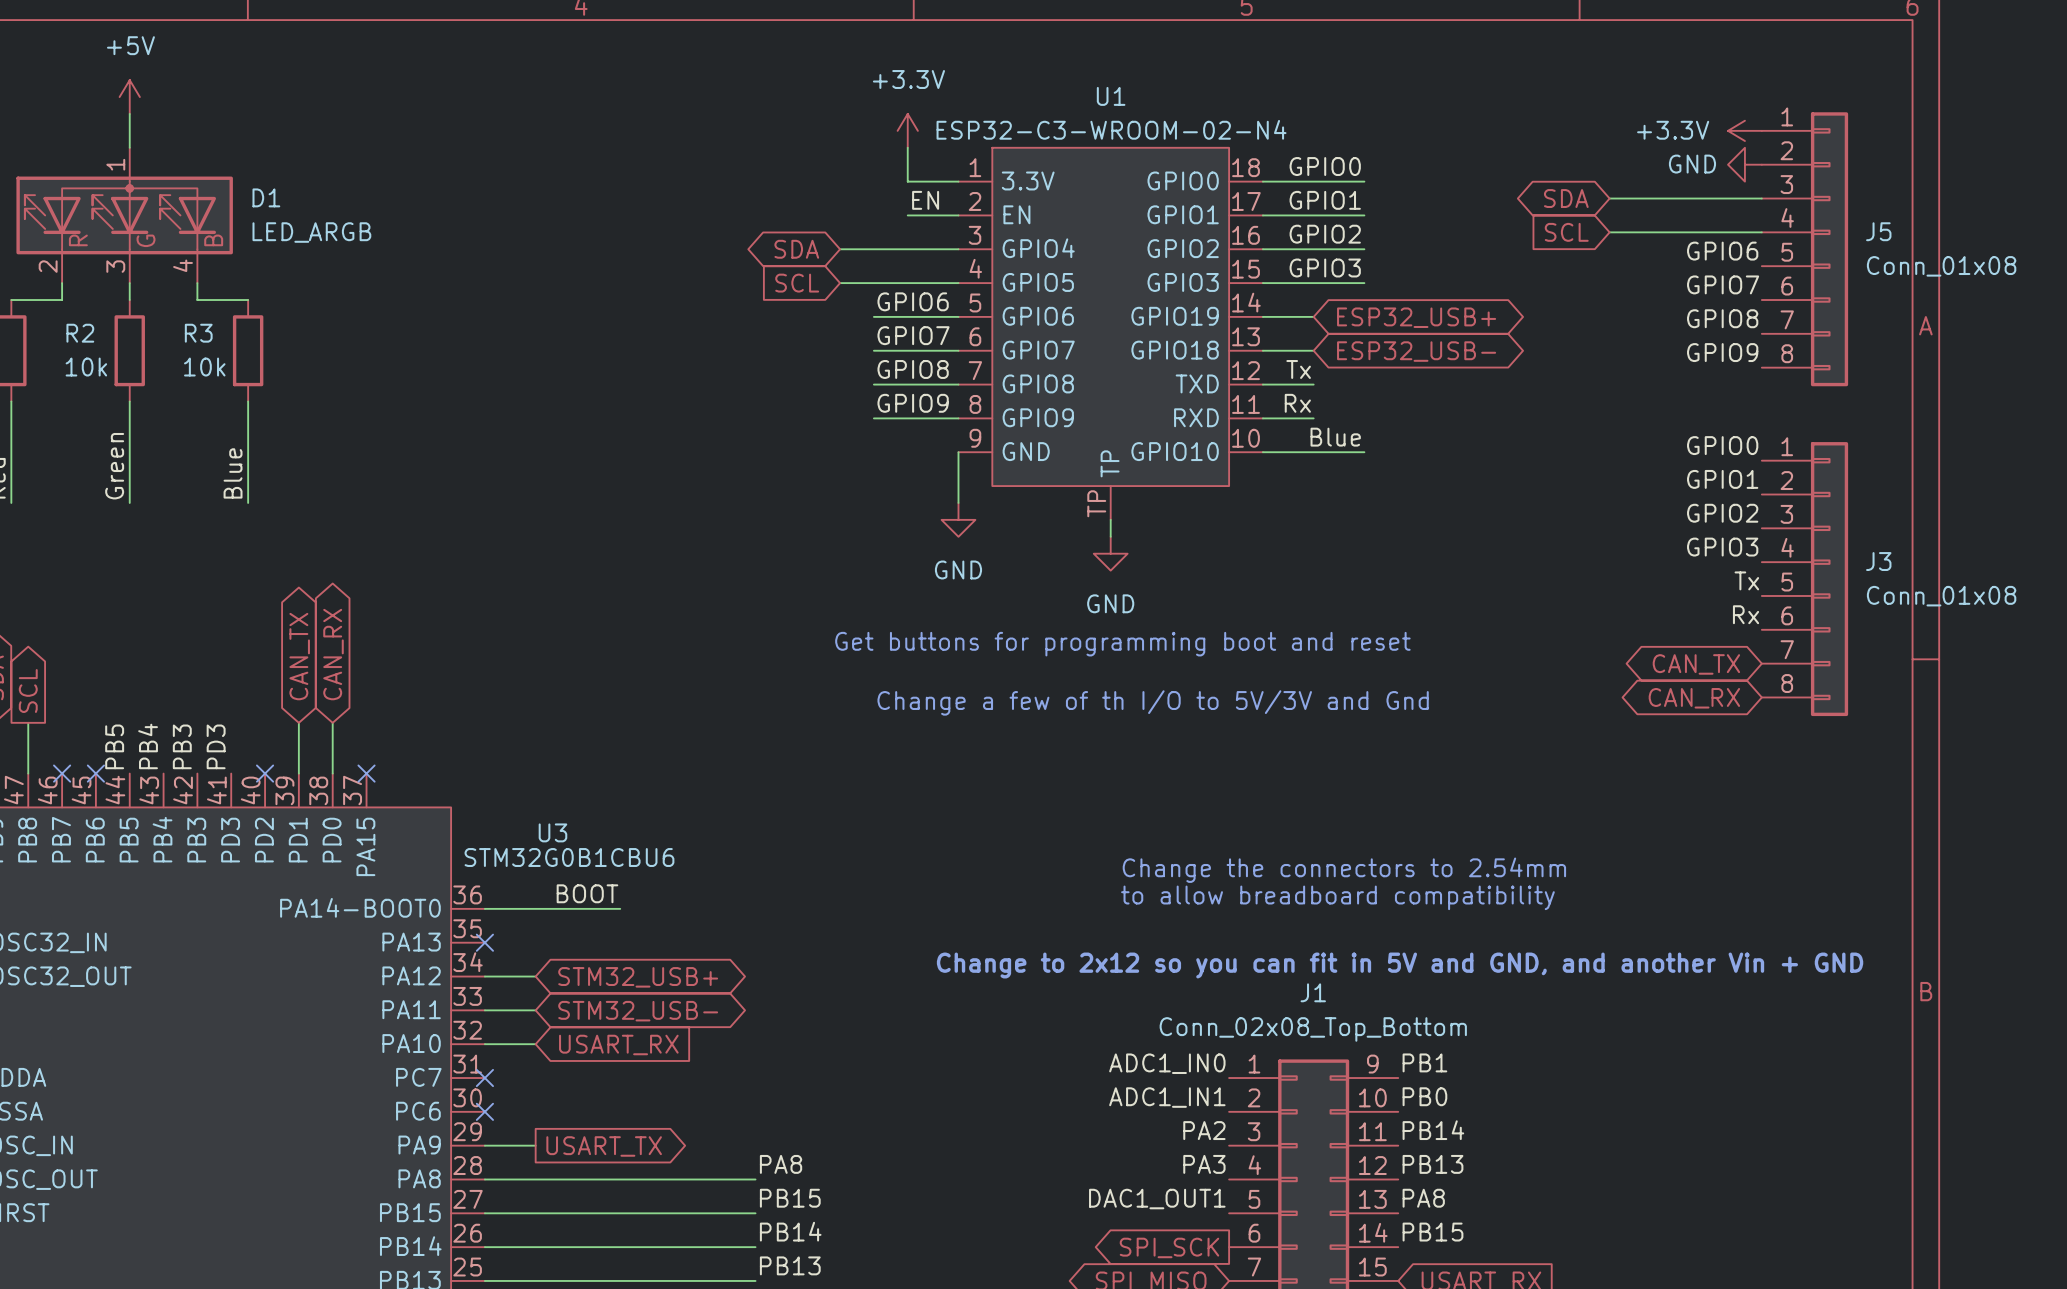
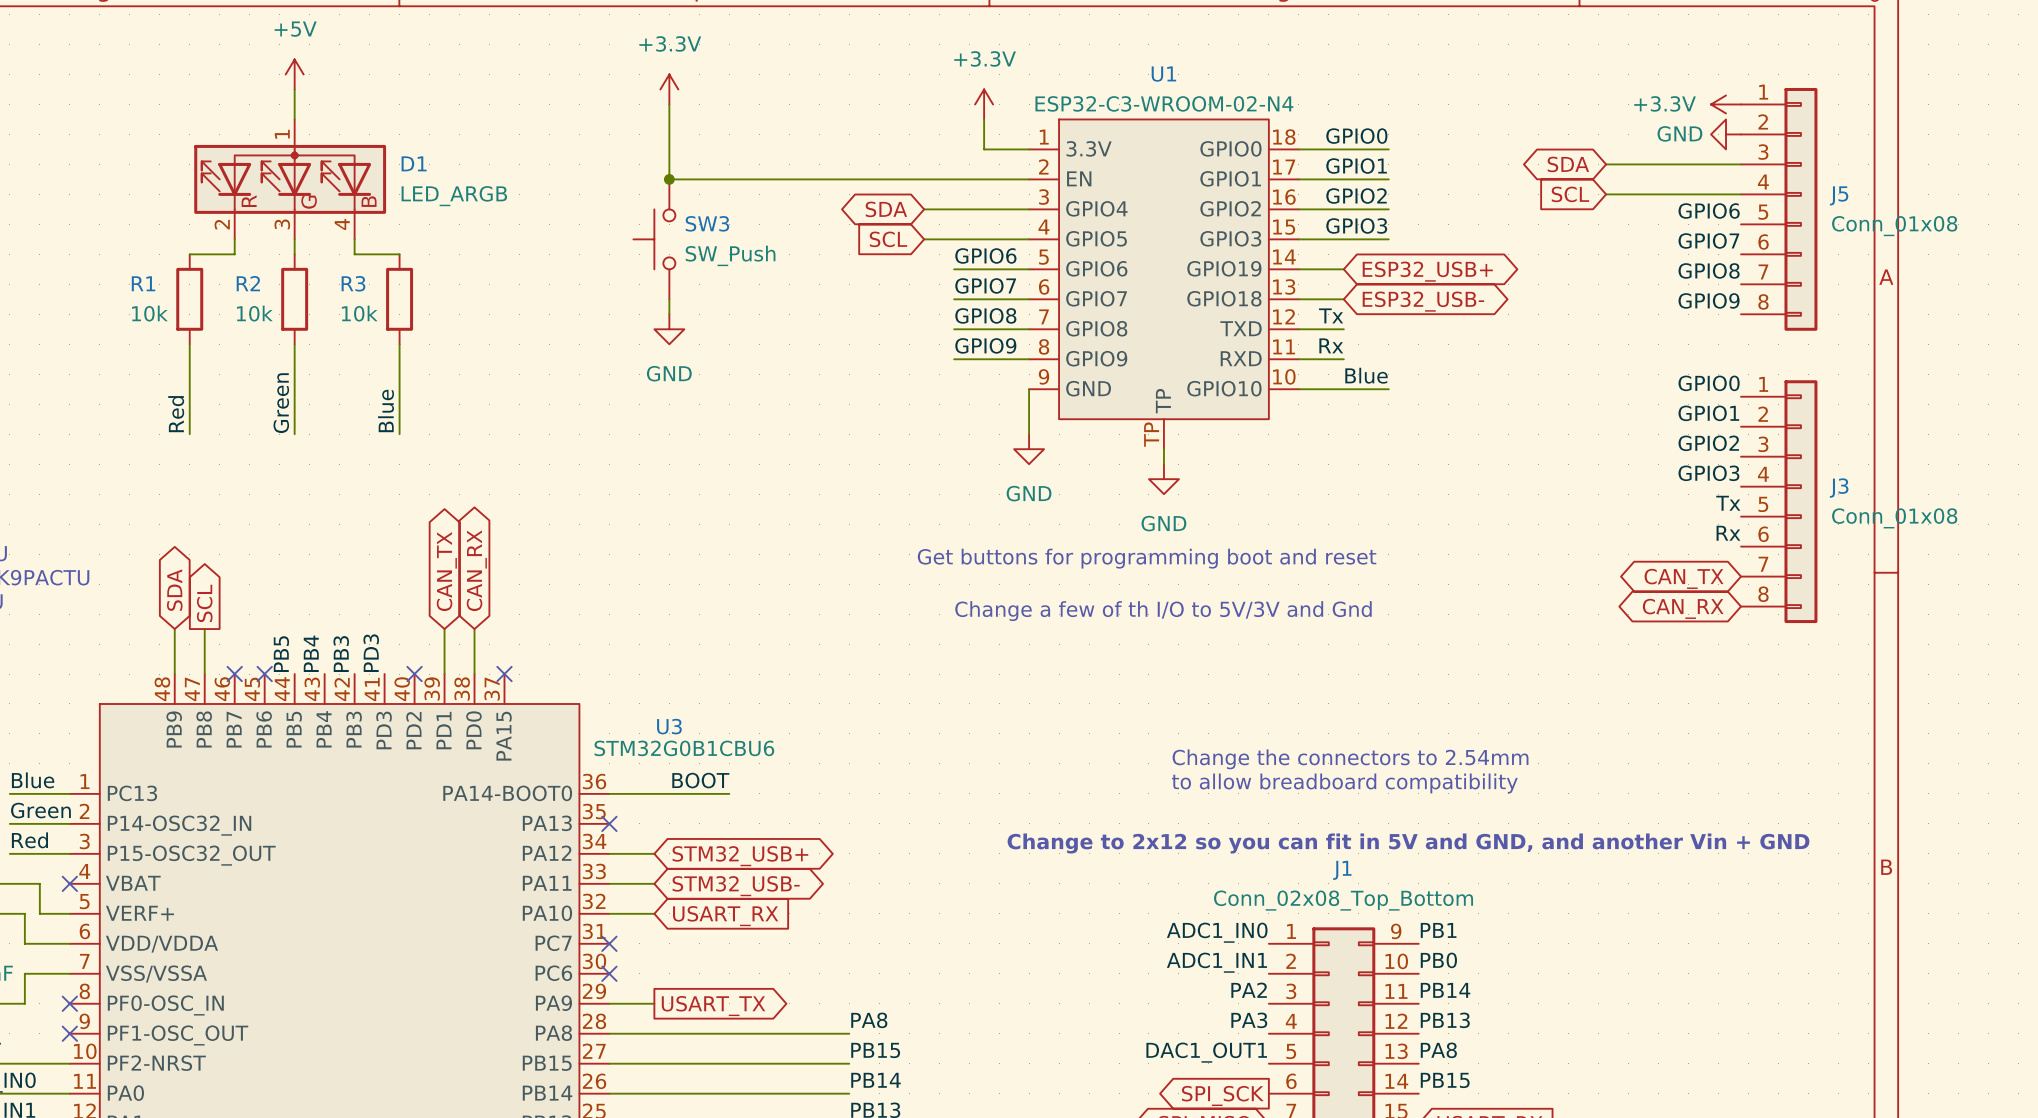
power symbol: none -> +3.3V (669, 89)
wire: none -> (669, 104) (669, 179) (984, 179)
label: EN (925, 200) -> none
junction: none -> (669, 179)
SW3: none -> SW_Push (654, 239)
wire: none -> (669, 299) (669, 314)
power symbol: none -> GND (669, 329)

